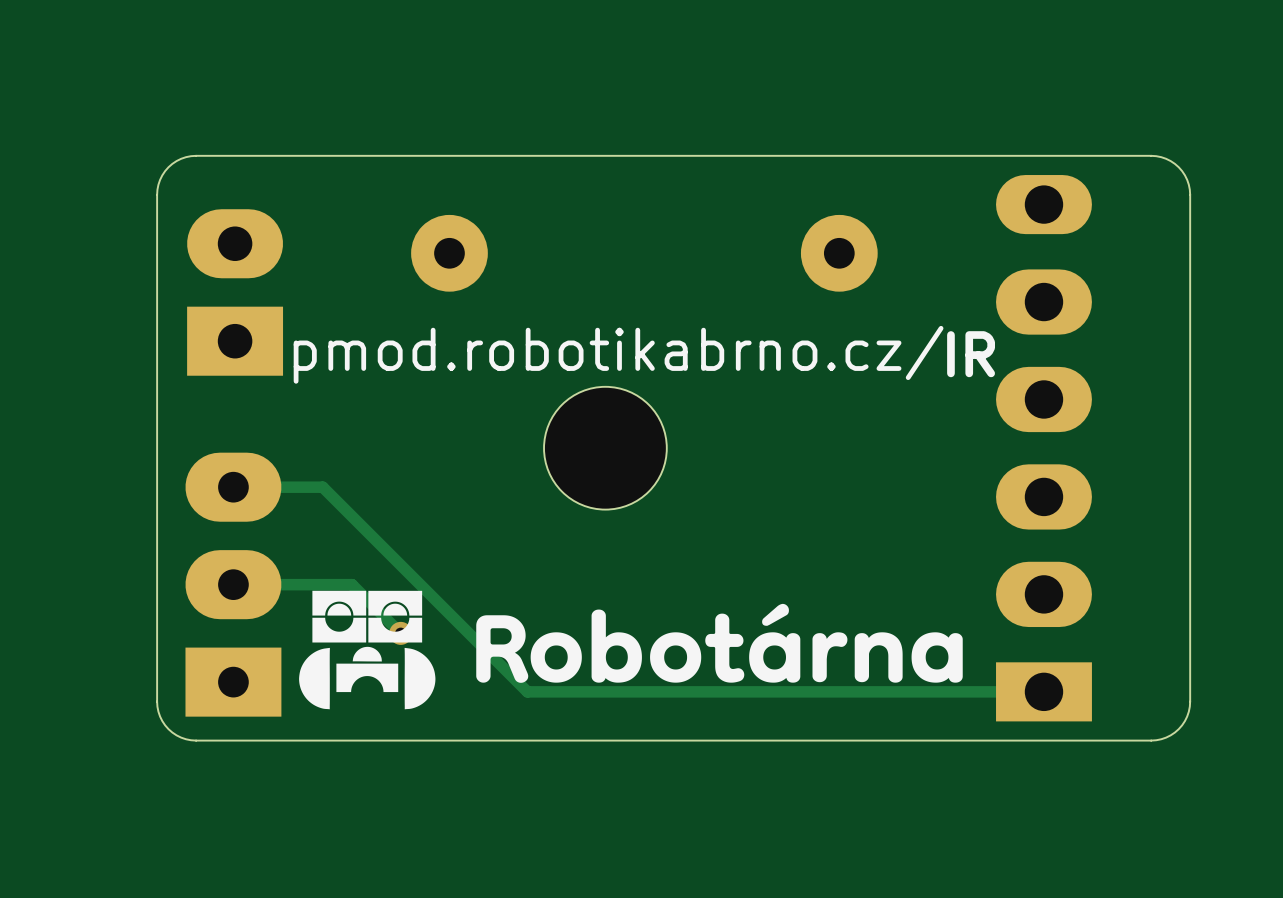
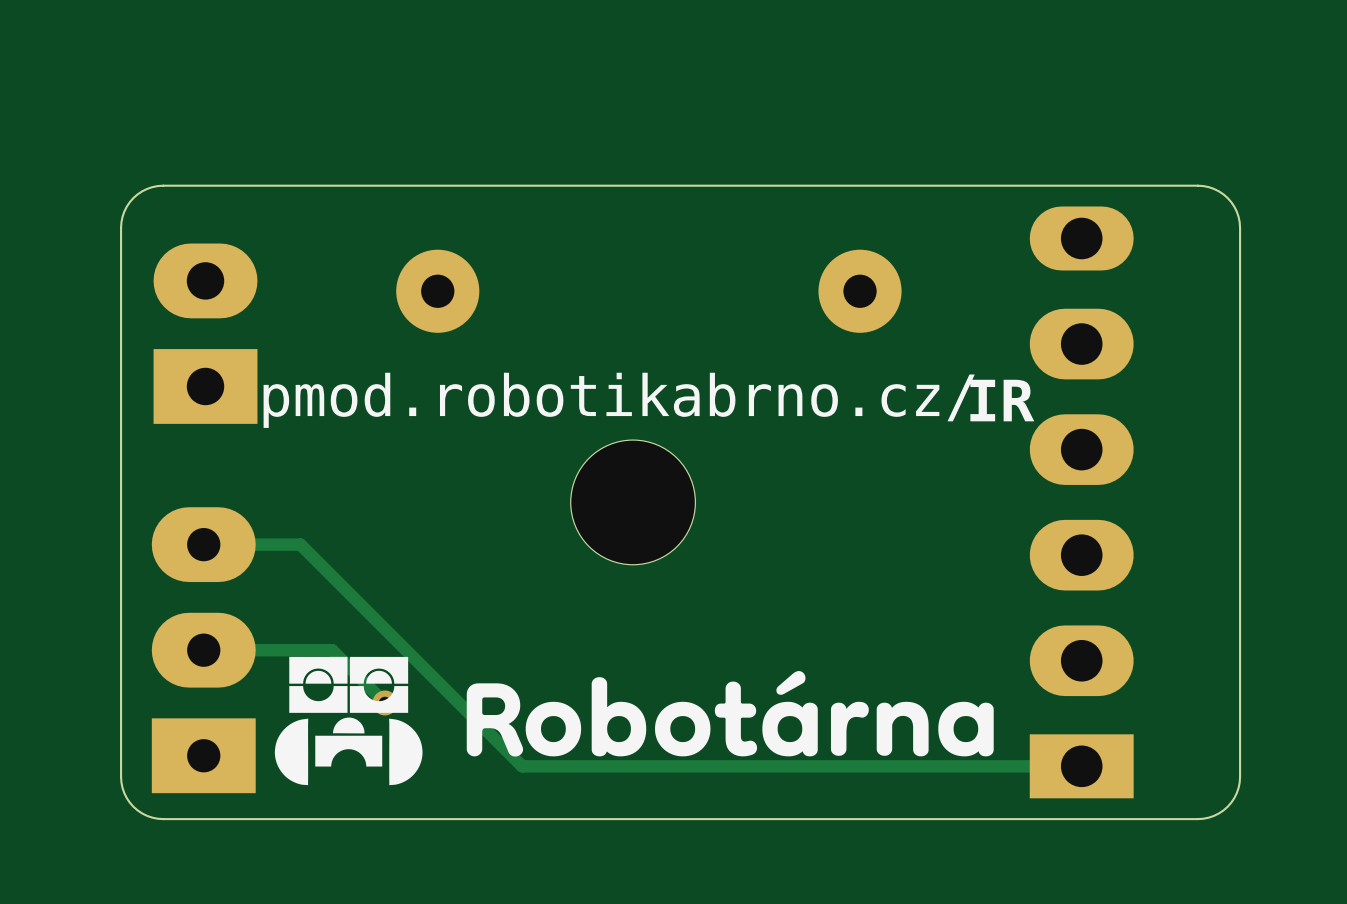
part footprint: [544, 386, 667, 510] -> [570, 440, 696, 565]

